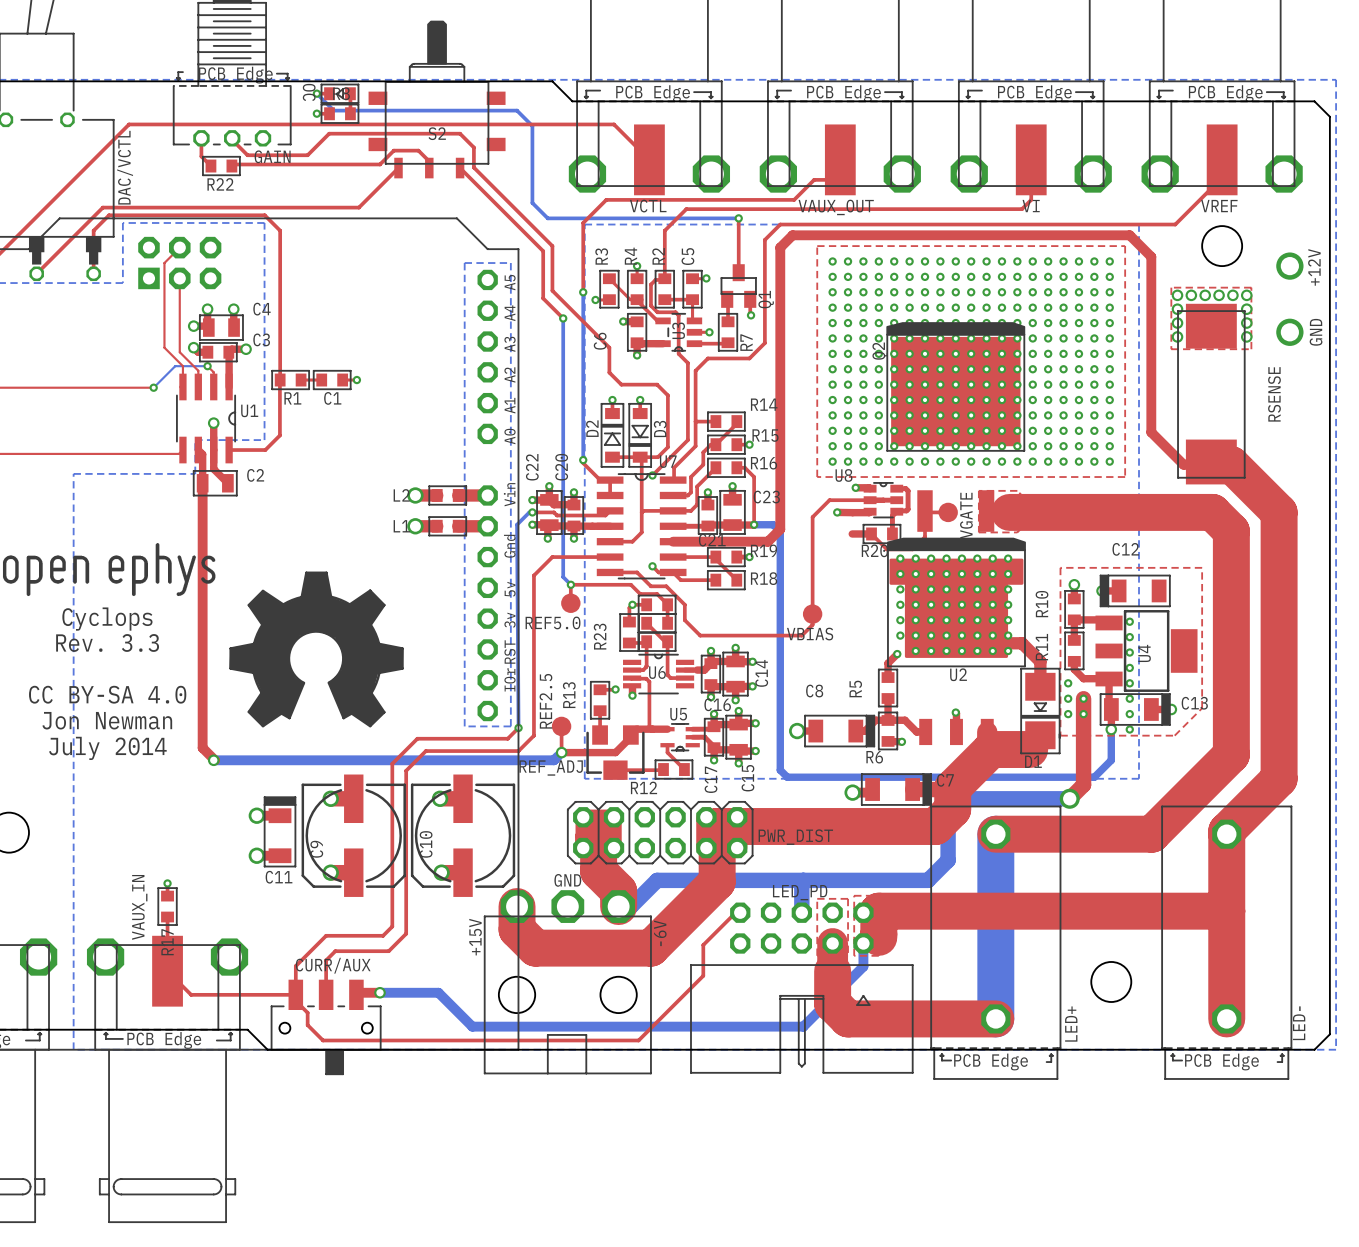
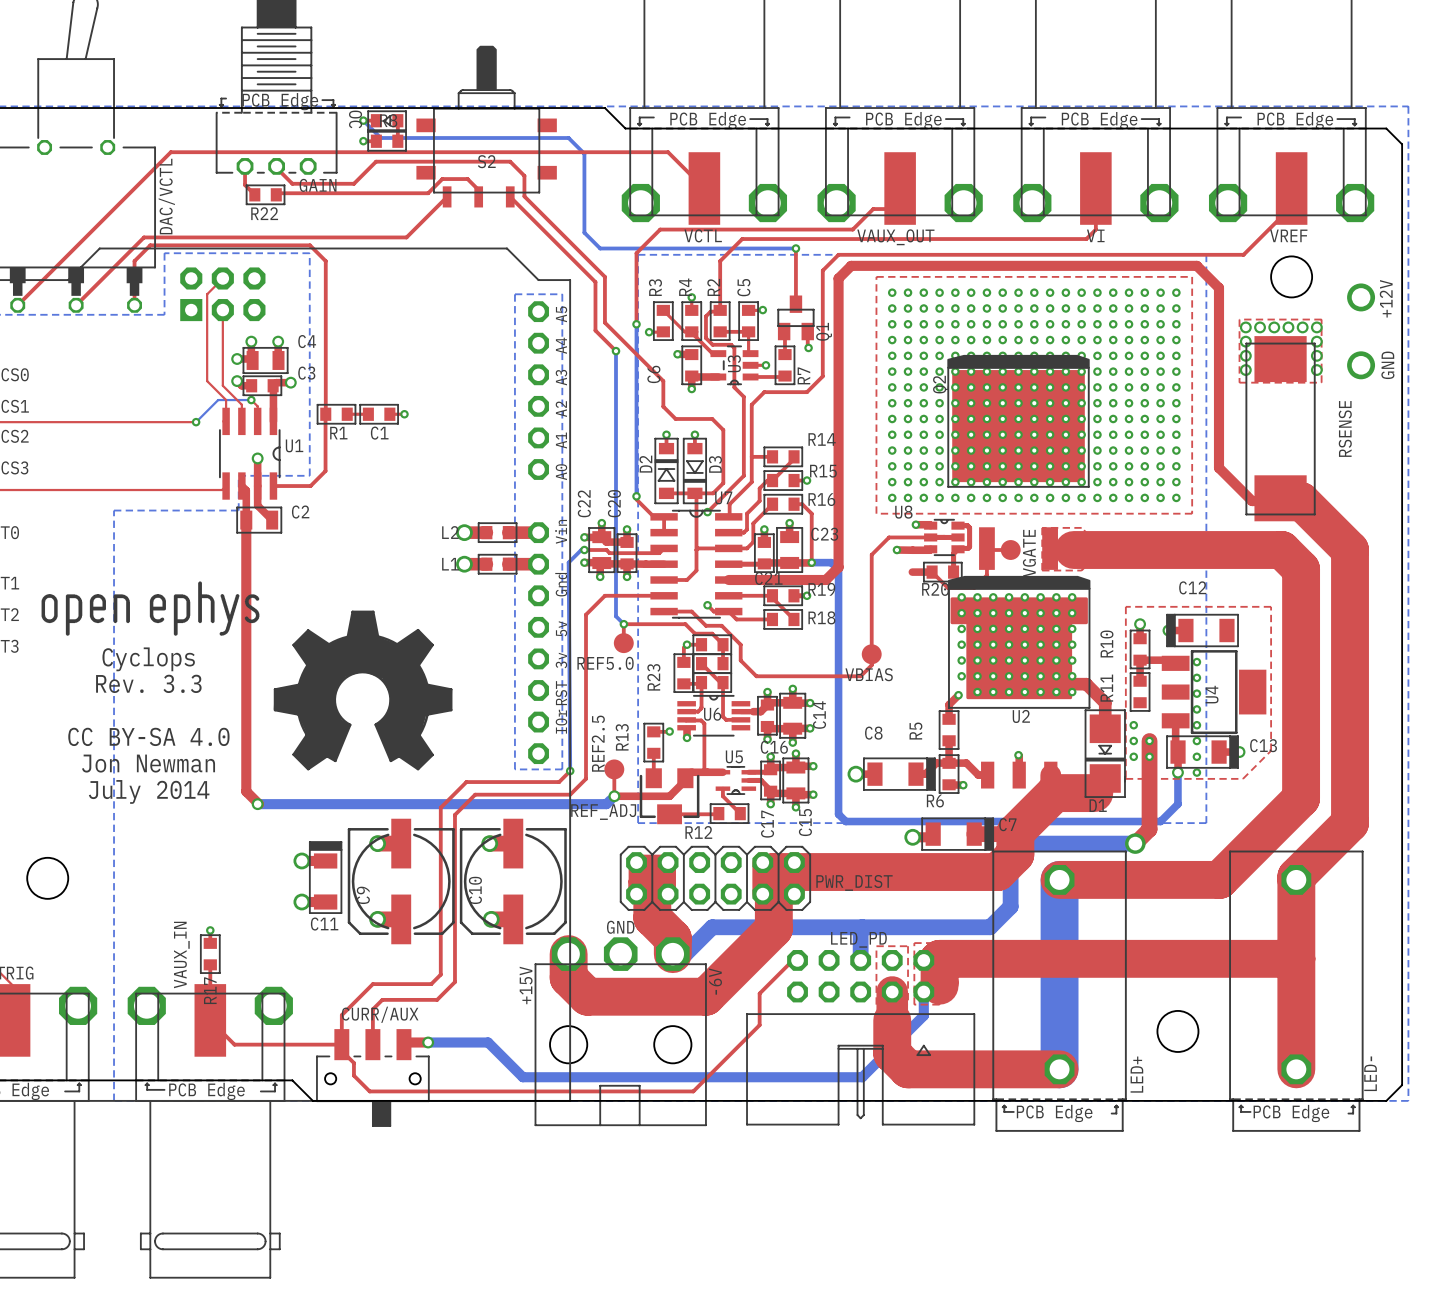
top track: (1074, 661) (1074, 669) (1083, 678) (1109, 678) -> none

